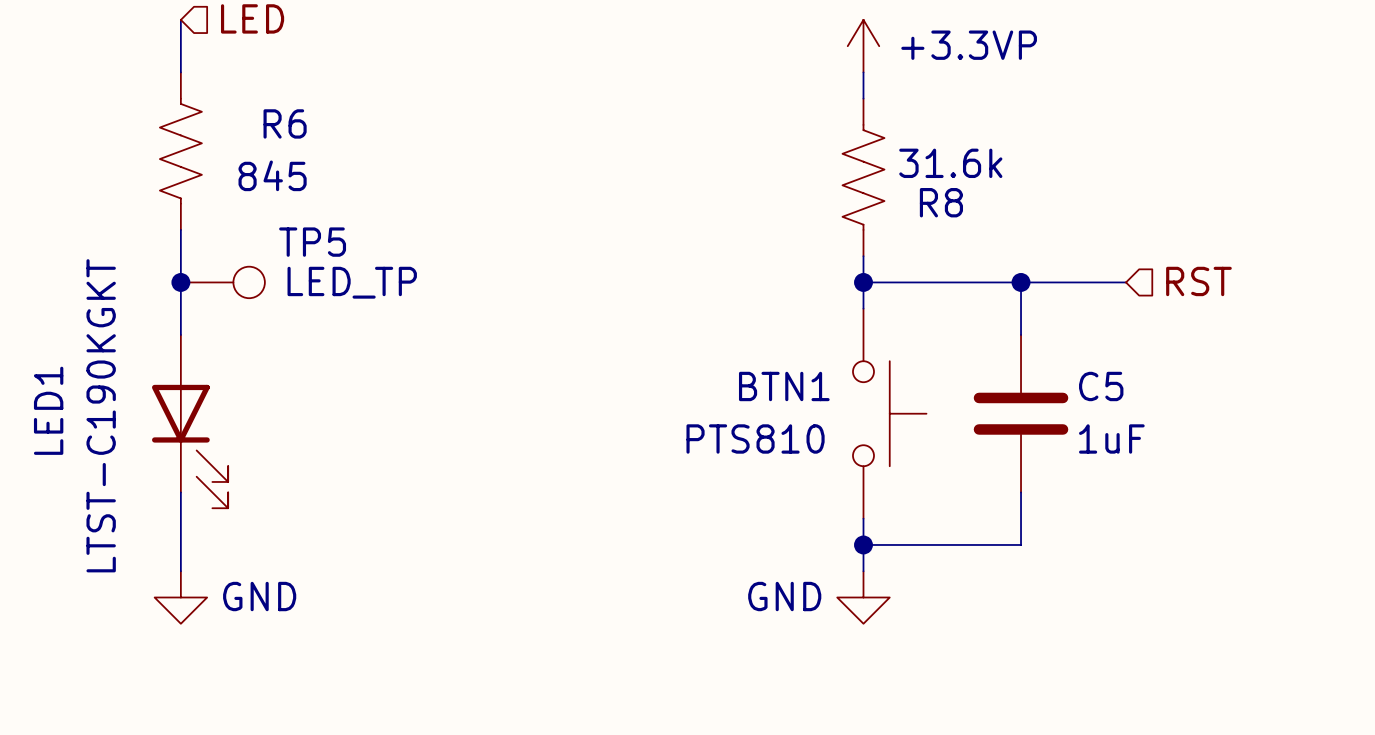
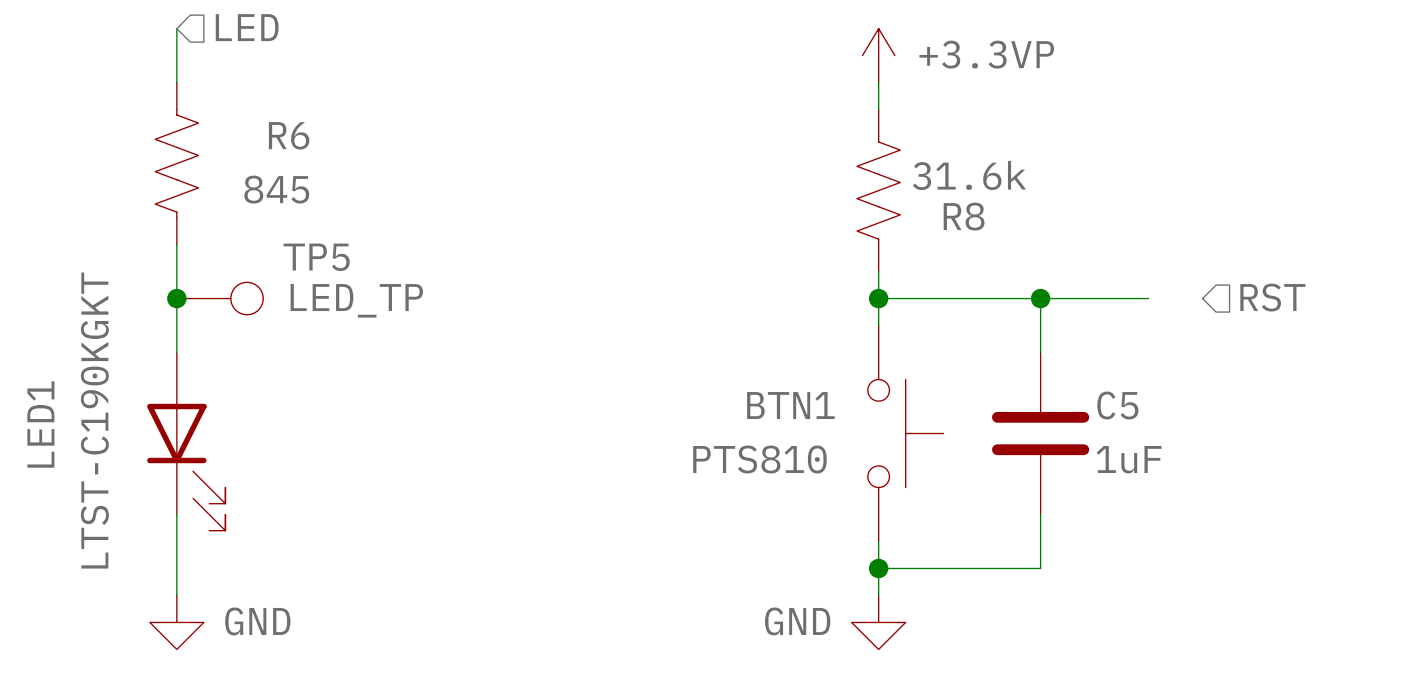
hierarchical label position: RST (1198, 281) -> RST (1272, 297)

